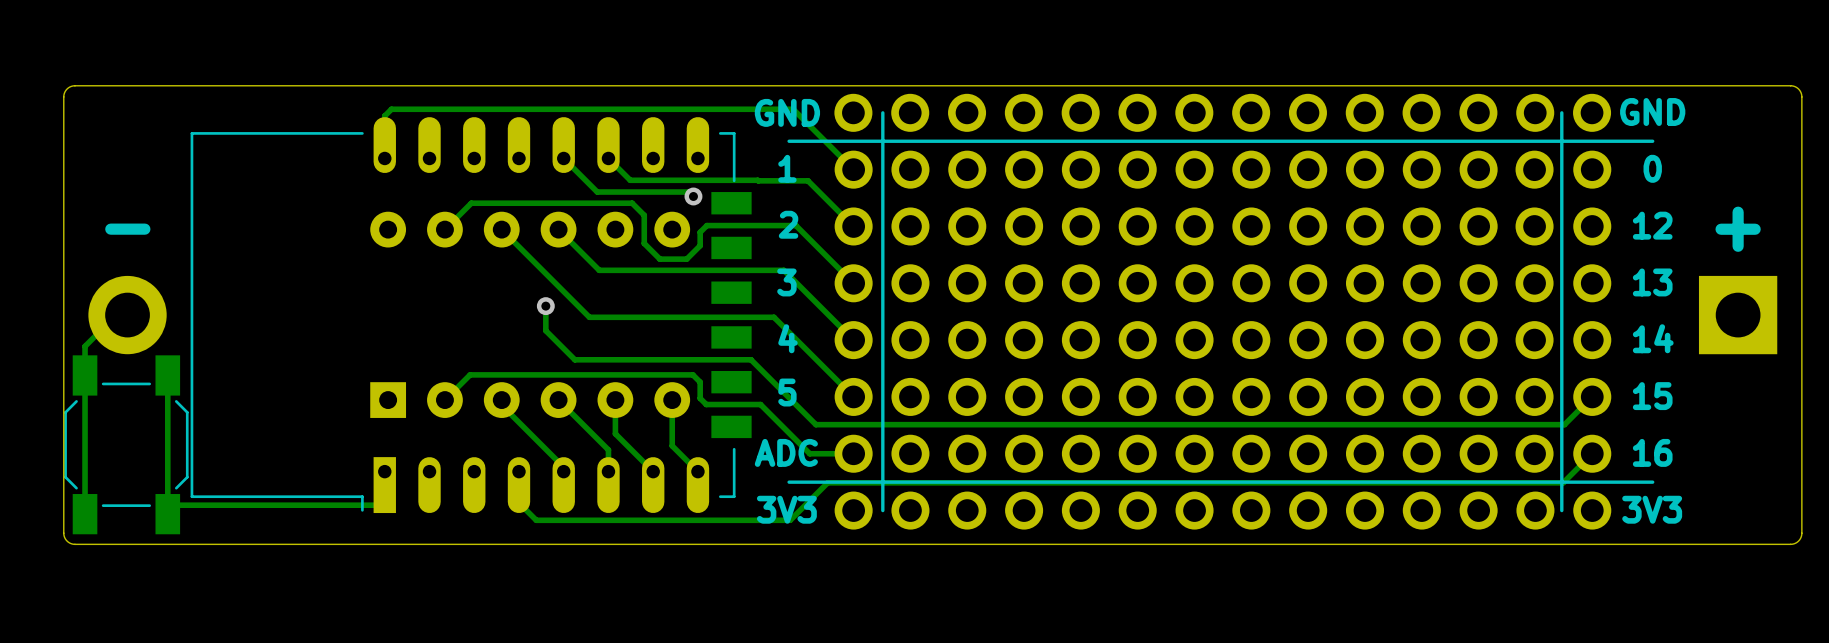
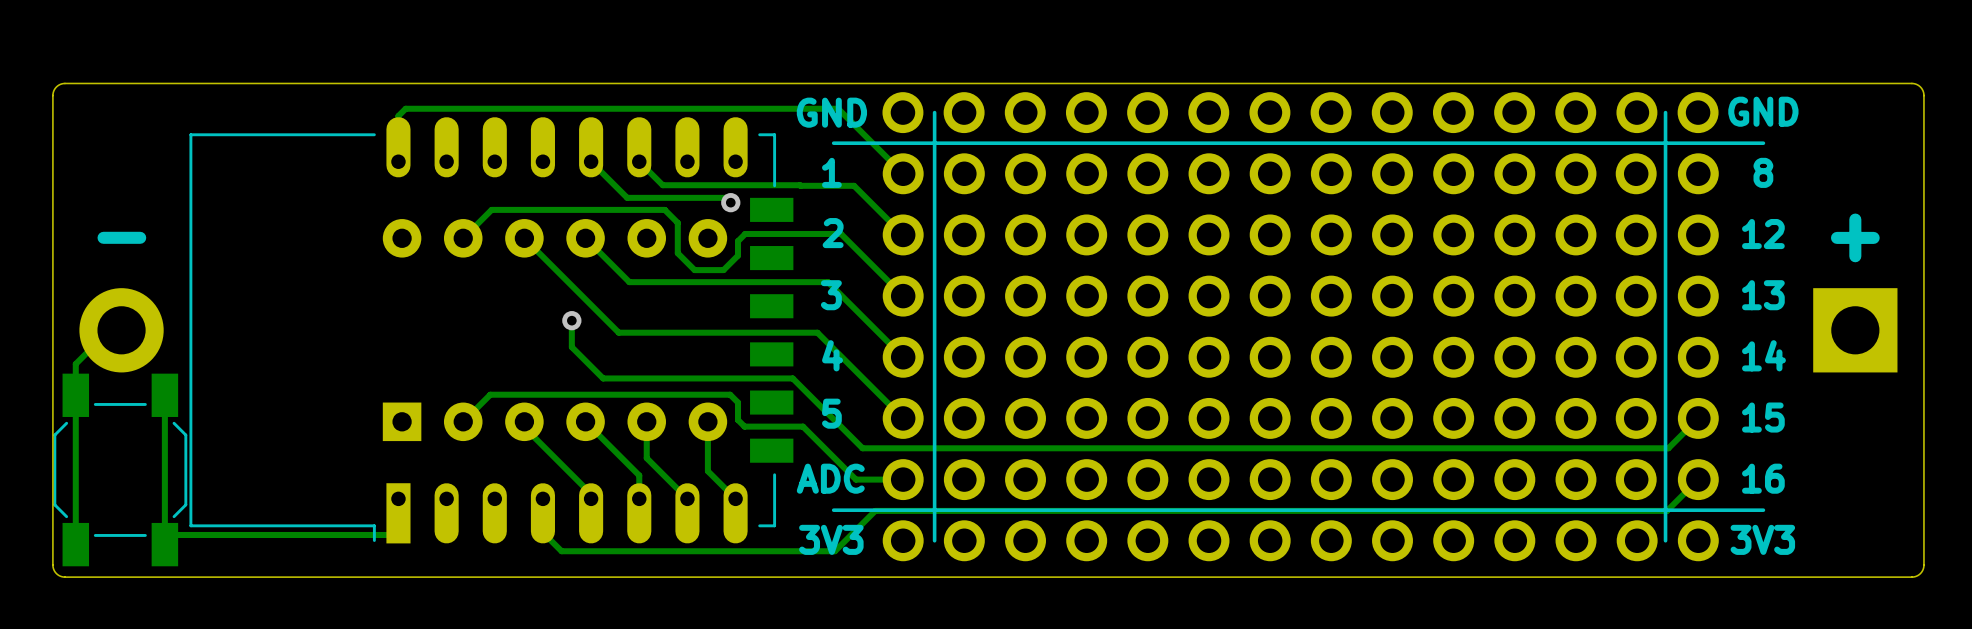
text: 0 (1652, 168) -> 8 (1763, 172)

